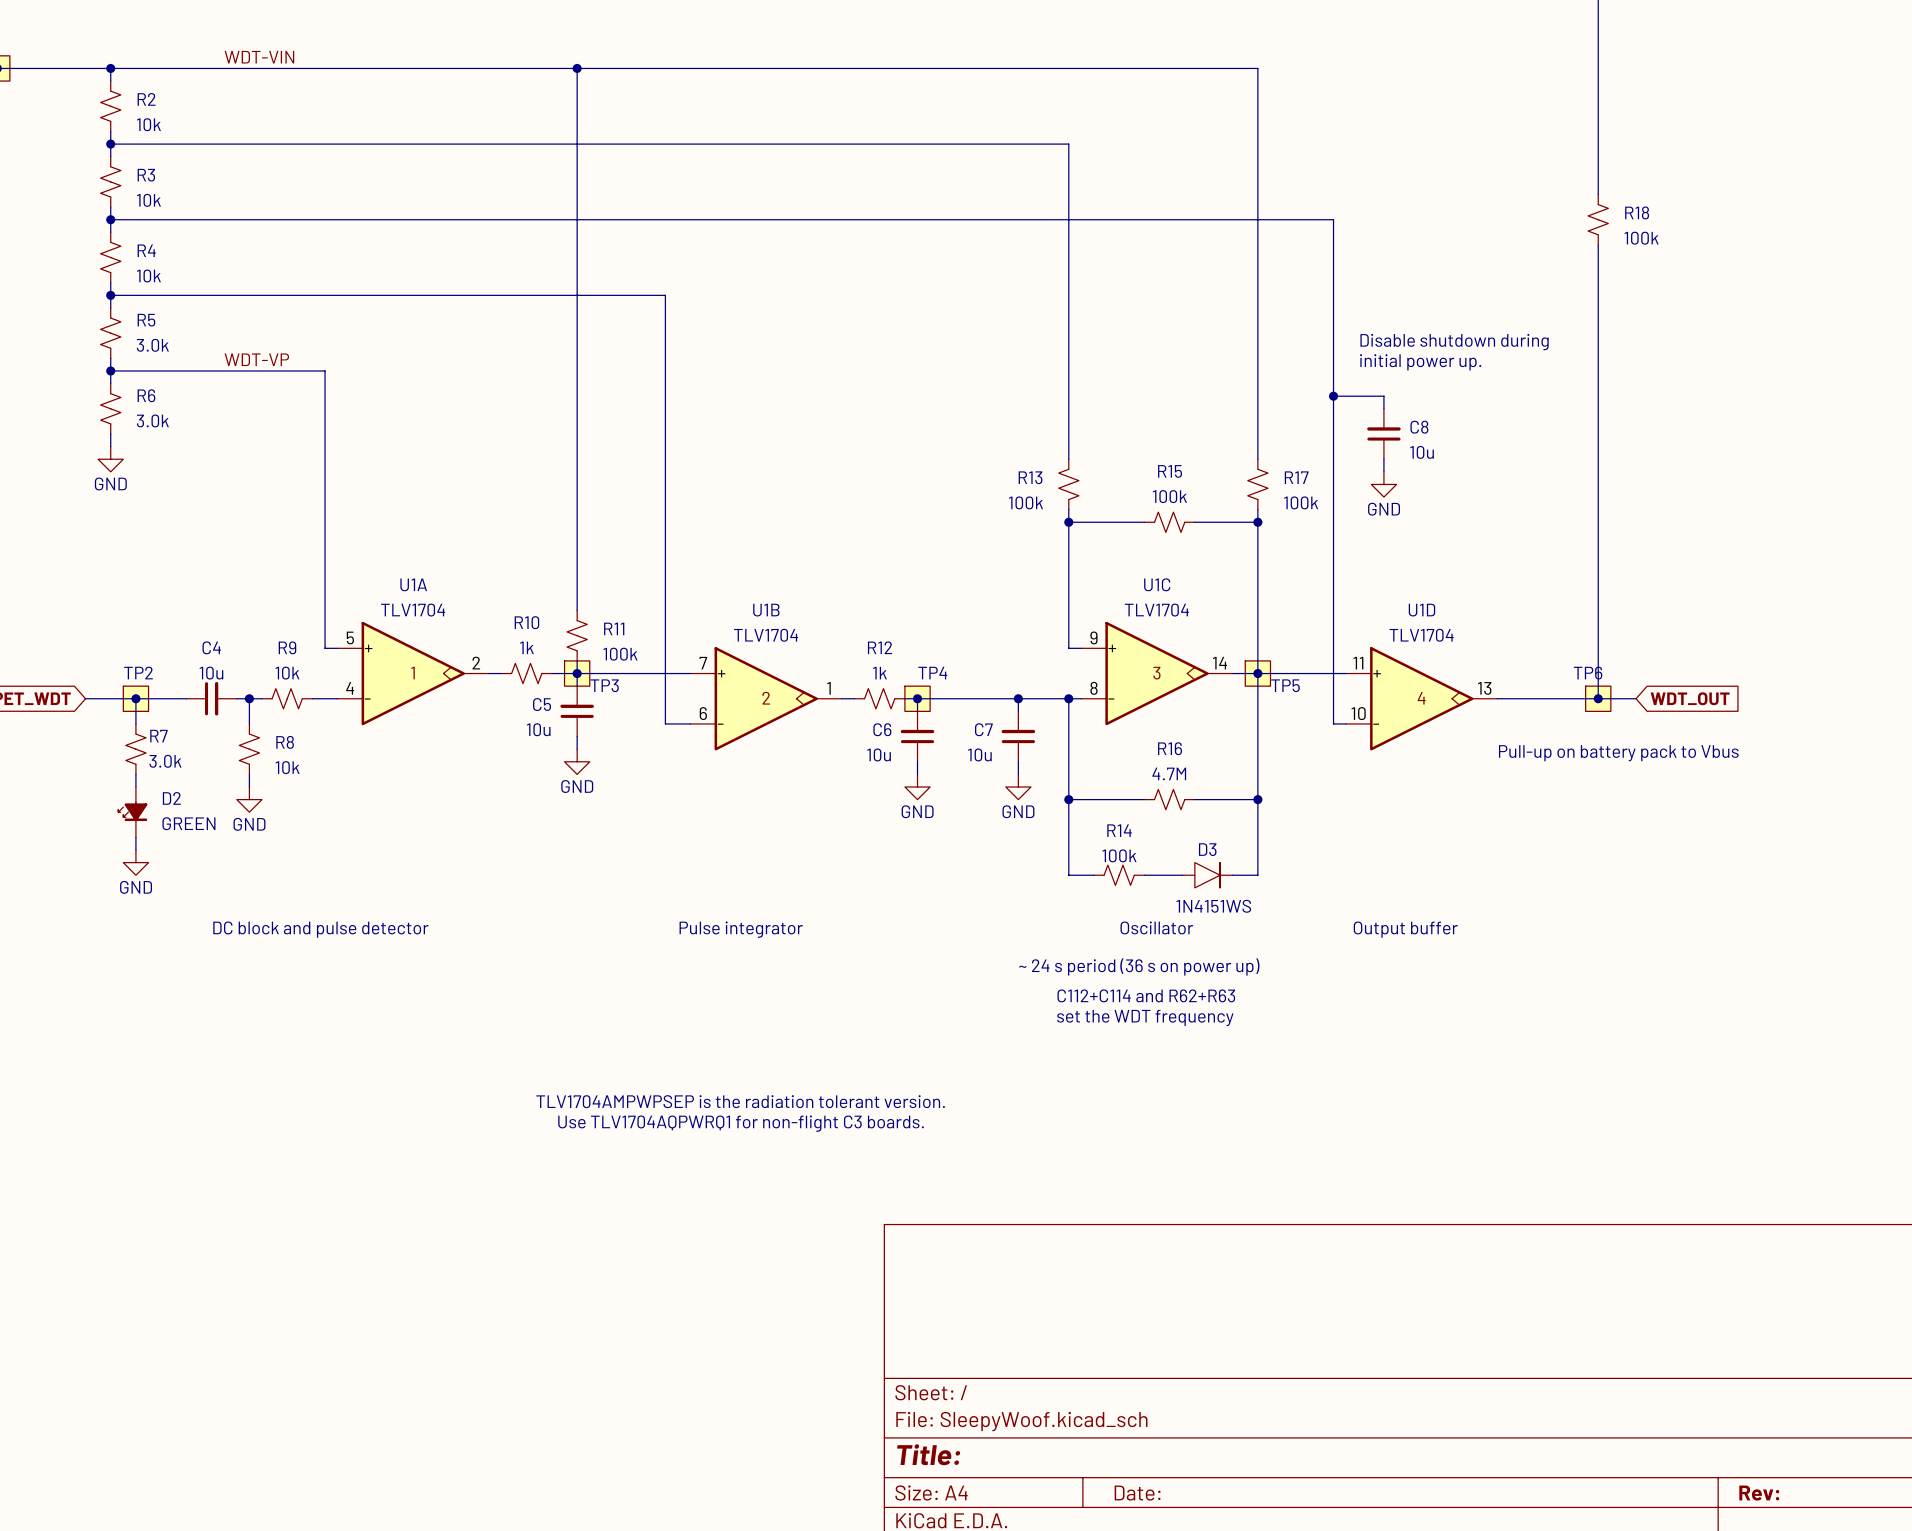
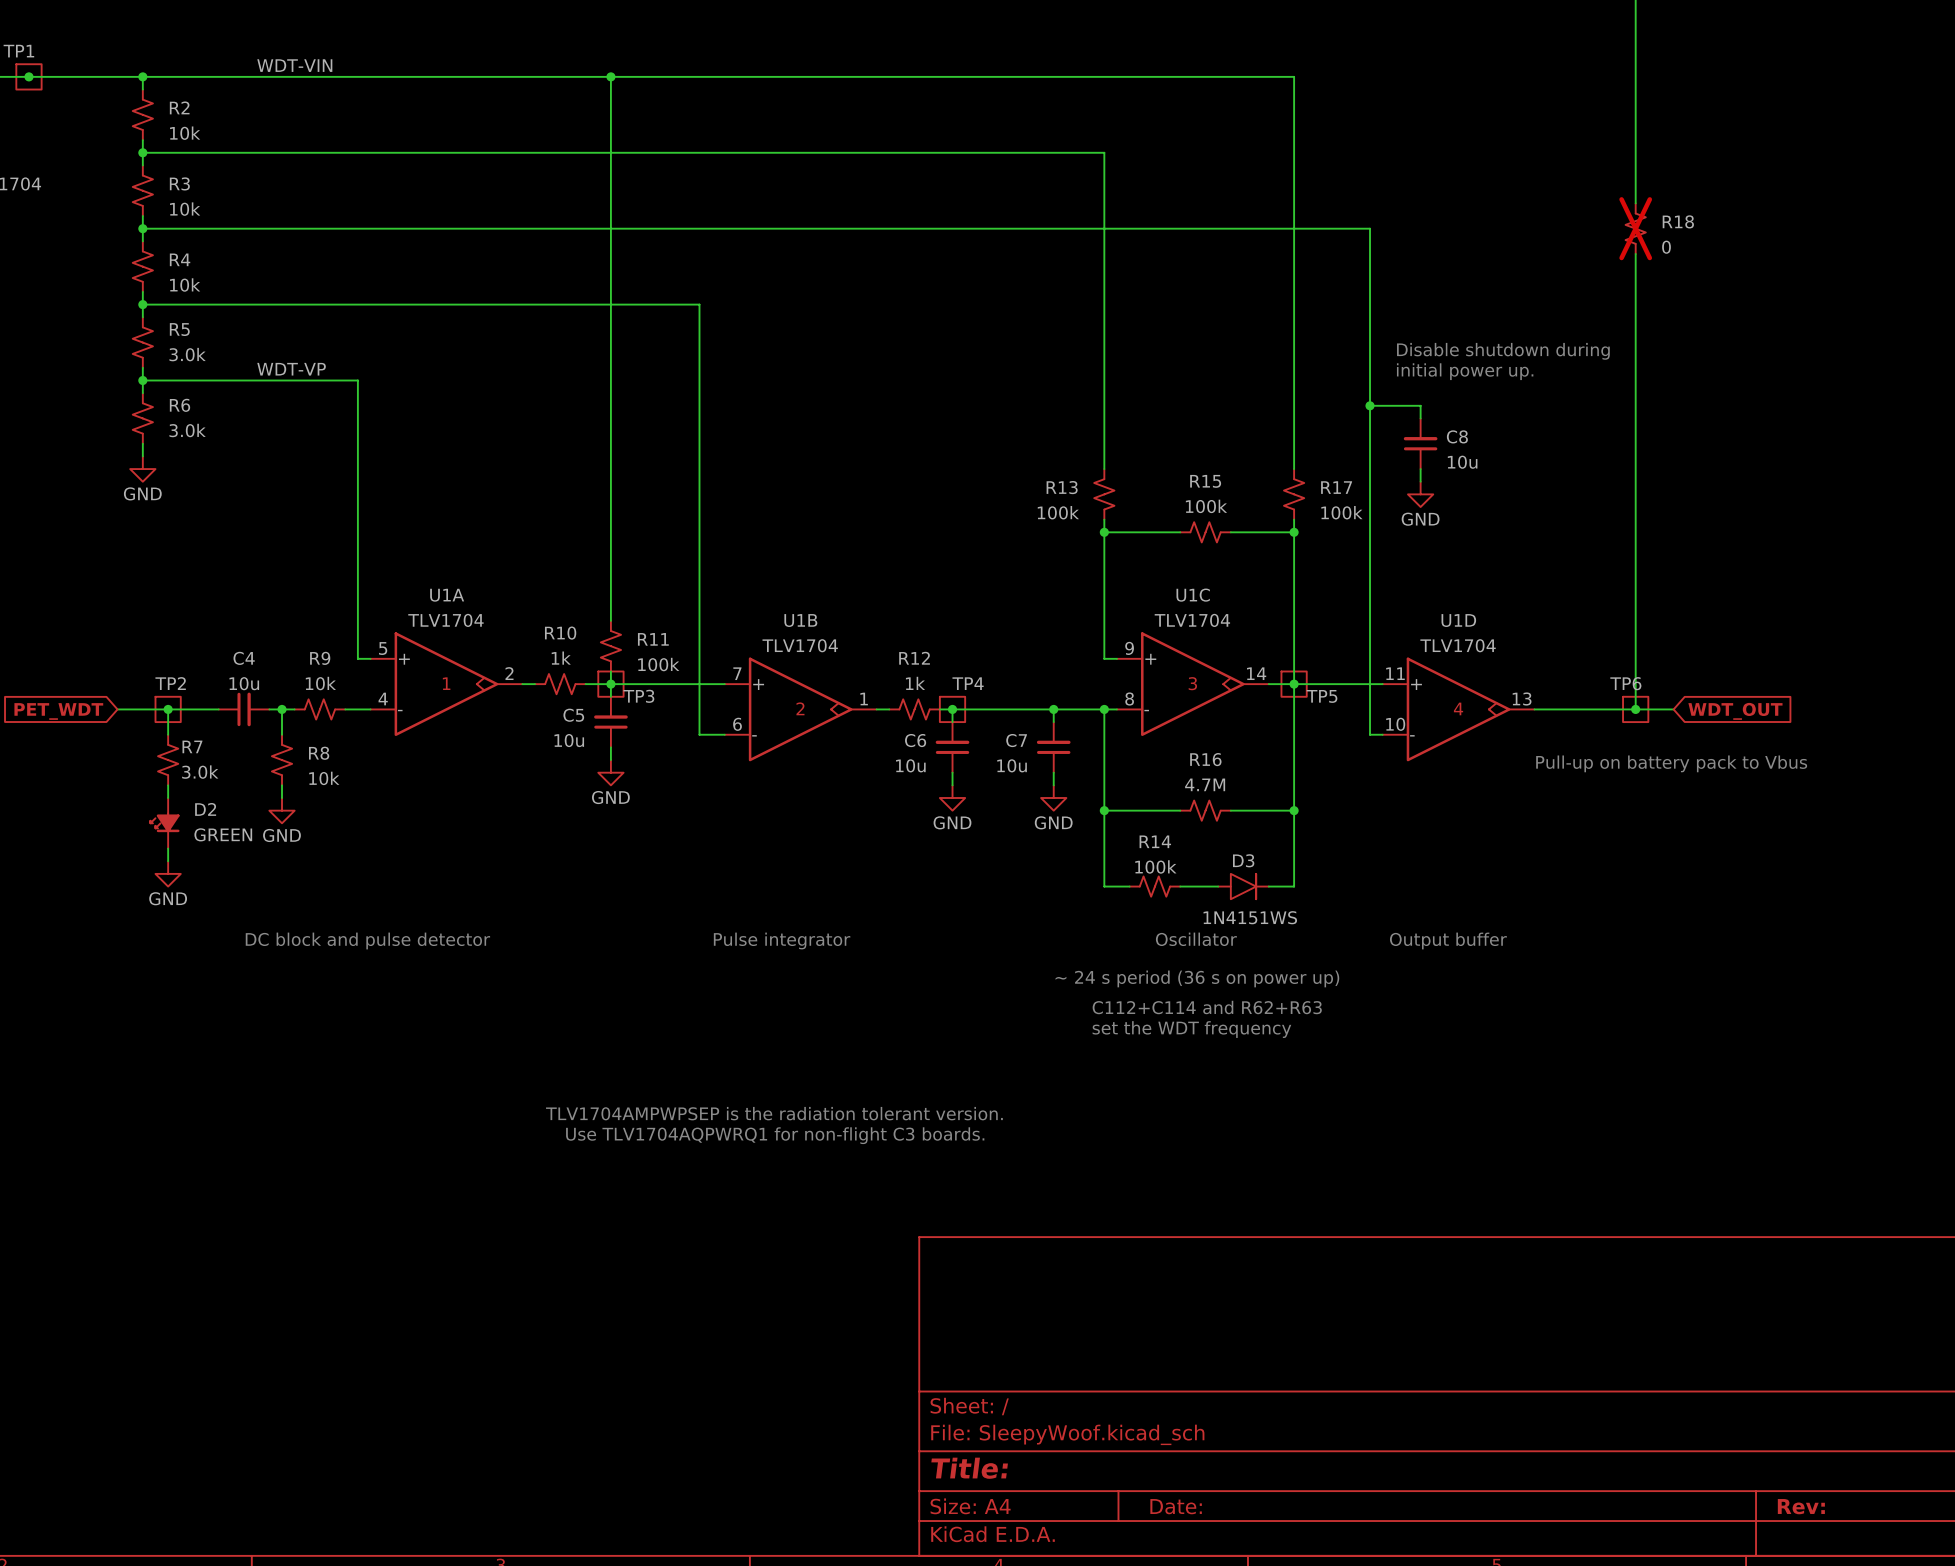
R18 do-not-place cross: none -> (1635, 228)
R18 value: 100k (1641, 238) -> 0 (1666, 247)

